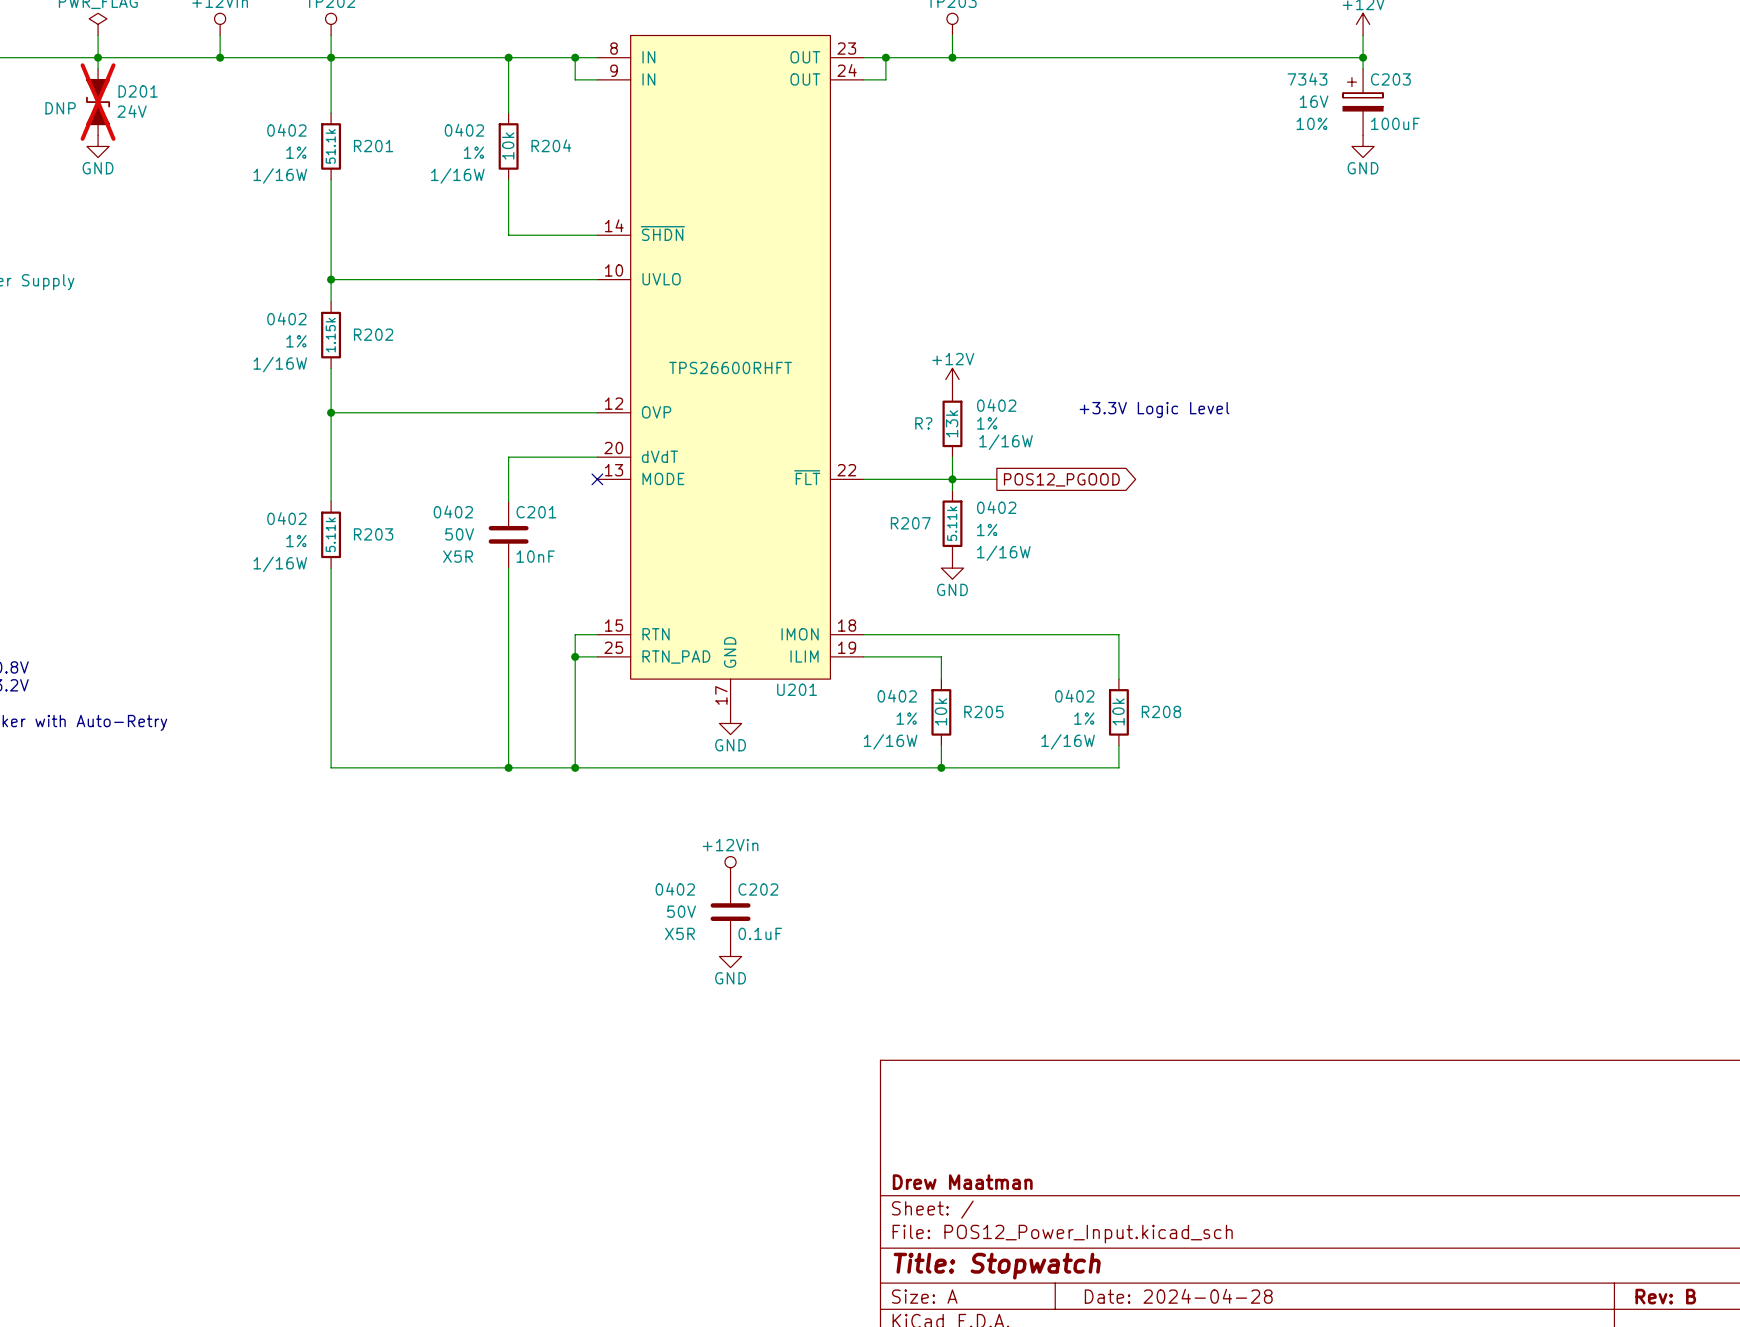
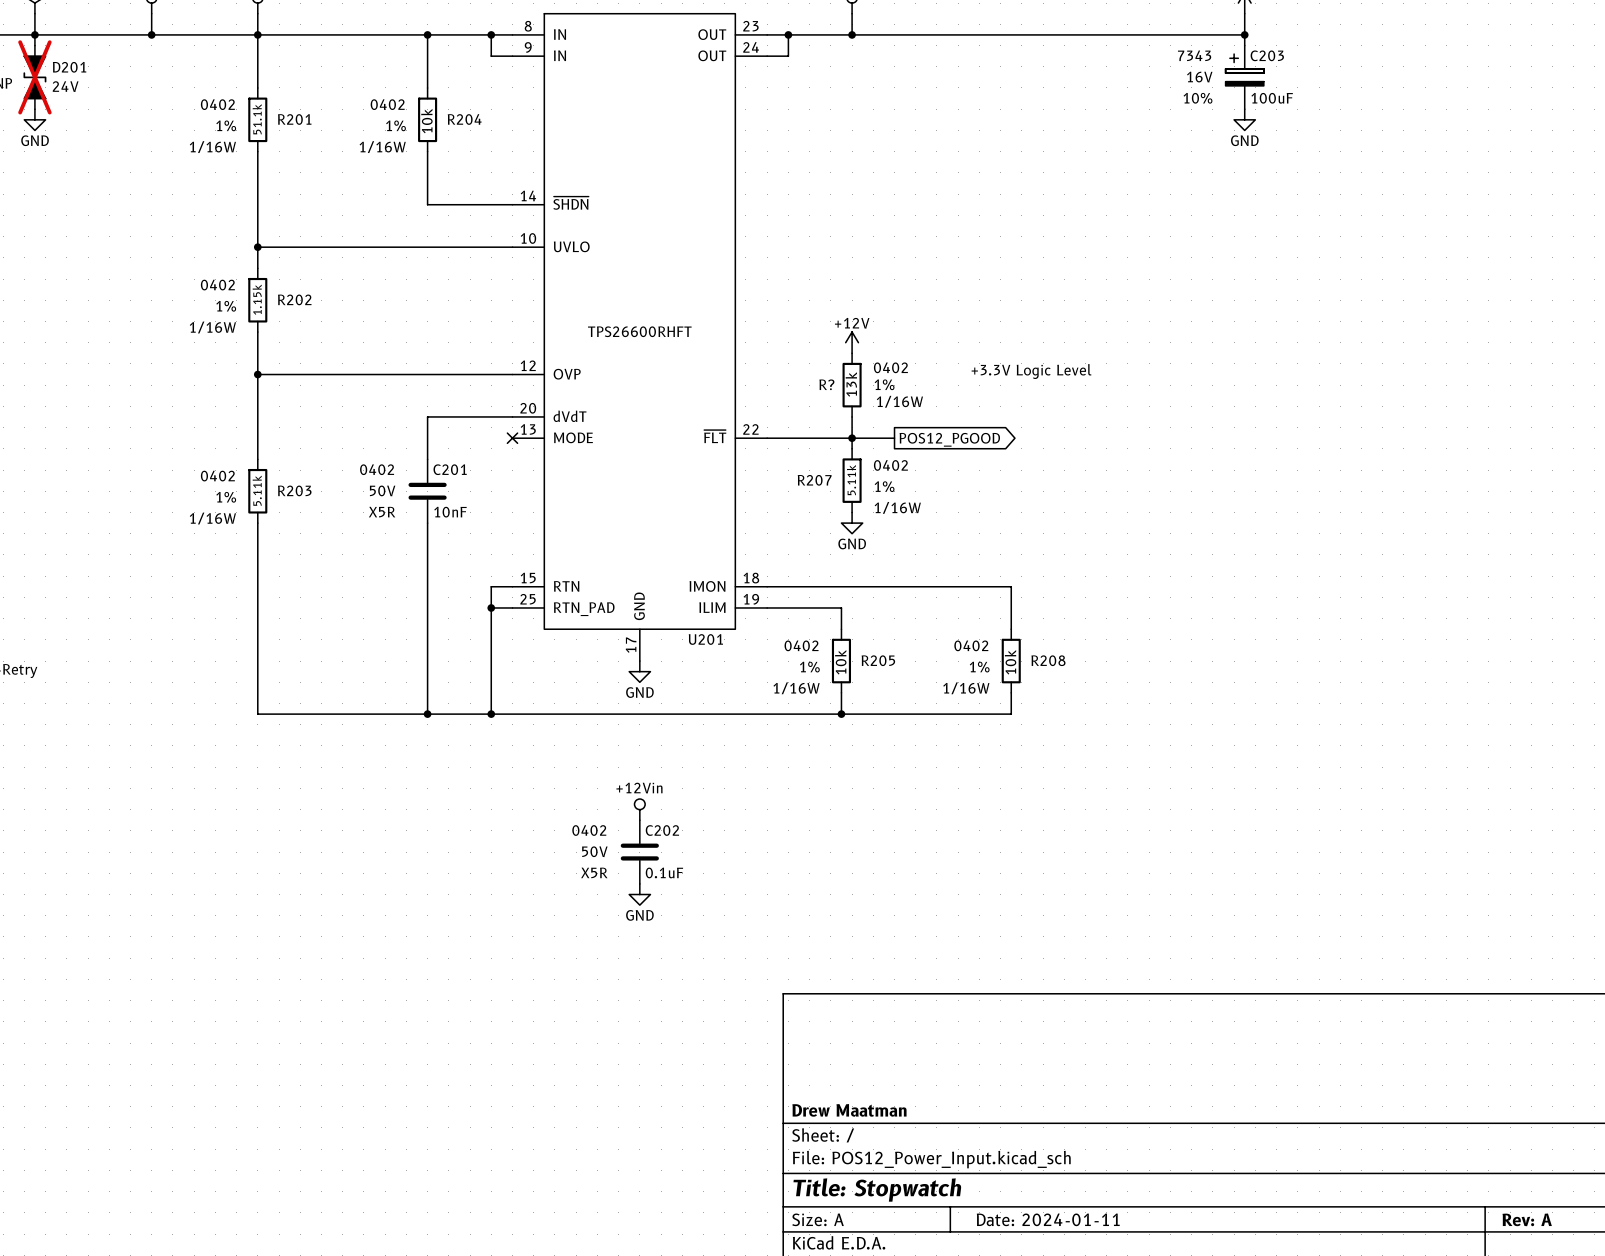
title block: Date: 2024-04-28 (1178, 1296) -> Date: 2024-01-11 (1048, 1219)
title block: Rev: B (1665, 1296) -> Rev: A (1527, 1219)

